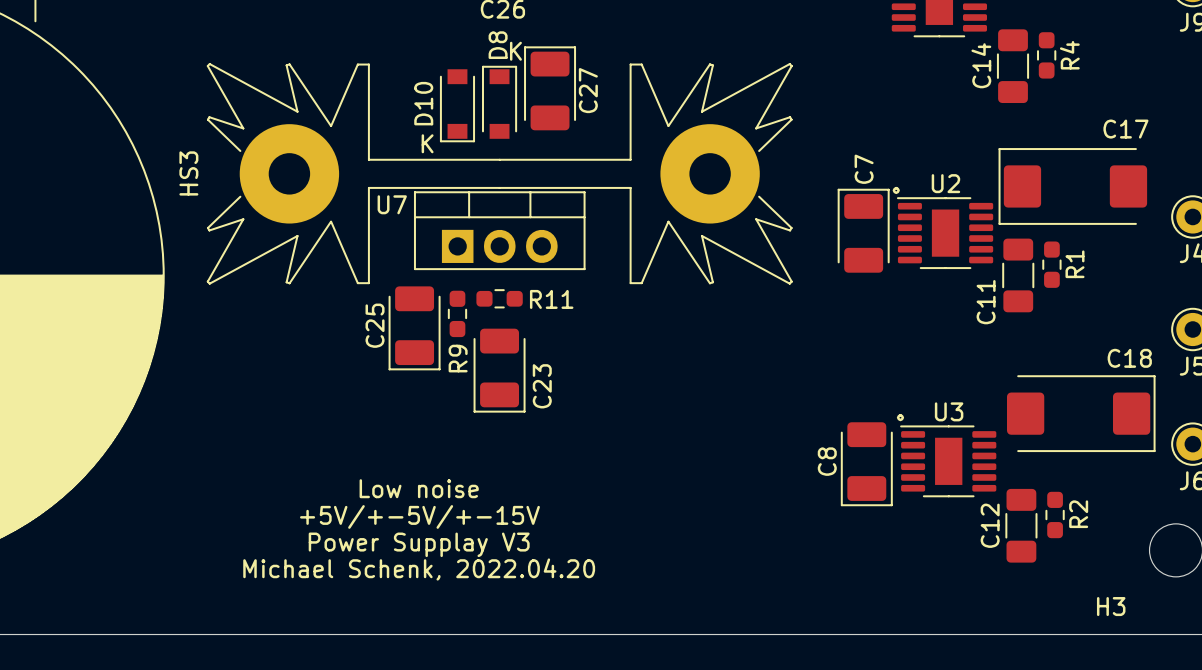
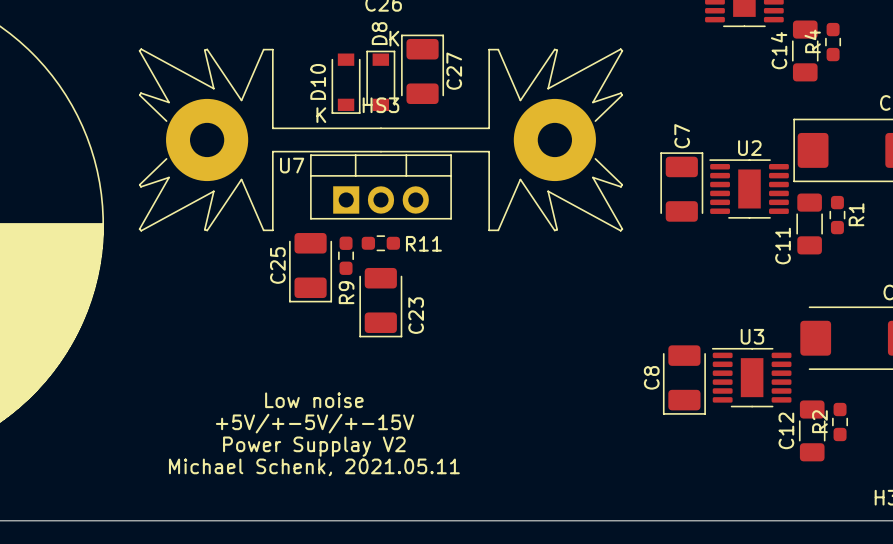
R4 name position: R4 (1069, 55) -> R4 (812, 41)
HS3 name rotation: 0° (188, 173) -> 90° clockwise (380, 105)
HS3 name position: HS3 (188, 173) -> HS3 (380, 105)
text: ° (896, 190) -> none
text: ° (900, 417) -> none
R2 name position: R2 (1078, 514) -> R2 (819, 421)
text: Power Supplay V3 (419, 544) -> Power Supplay V2 (314, 446)
text: Michael Schenk, 2022.04.20 (419, 569) -> Michael Schenk, 2021.05.11 (314, 467)

